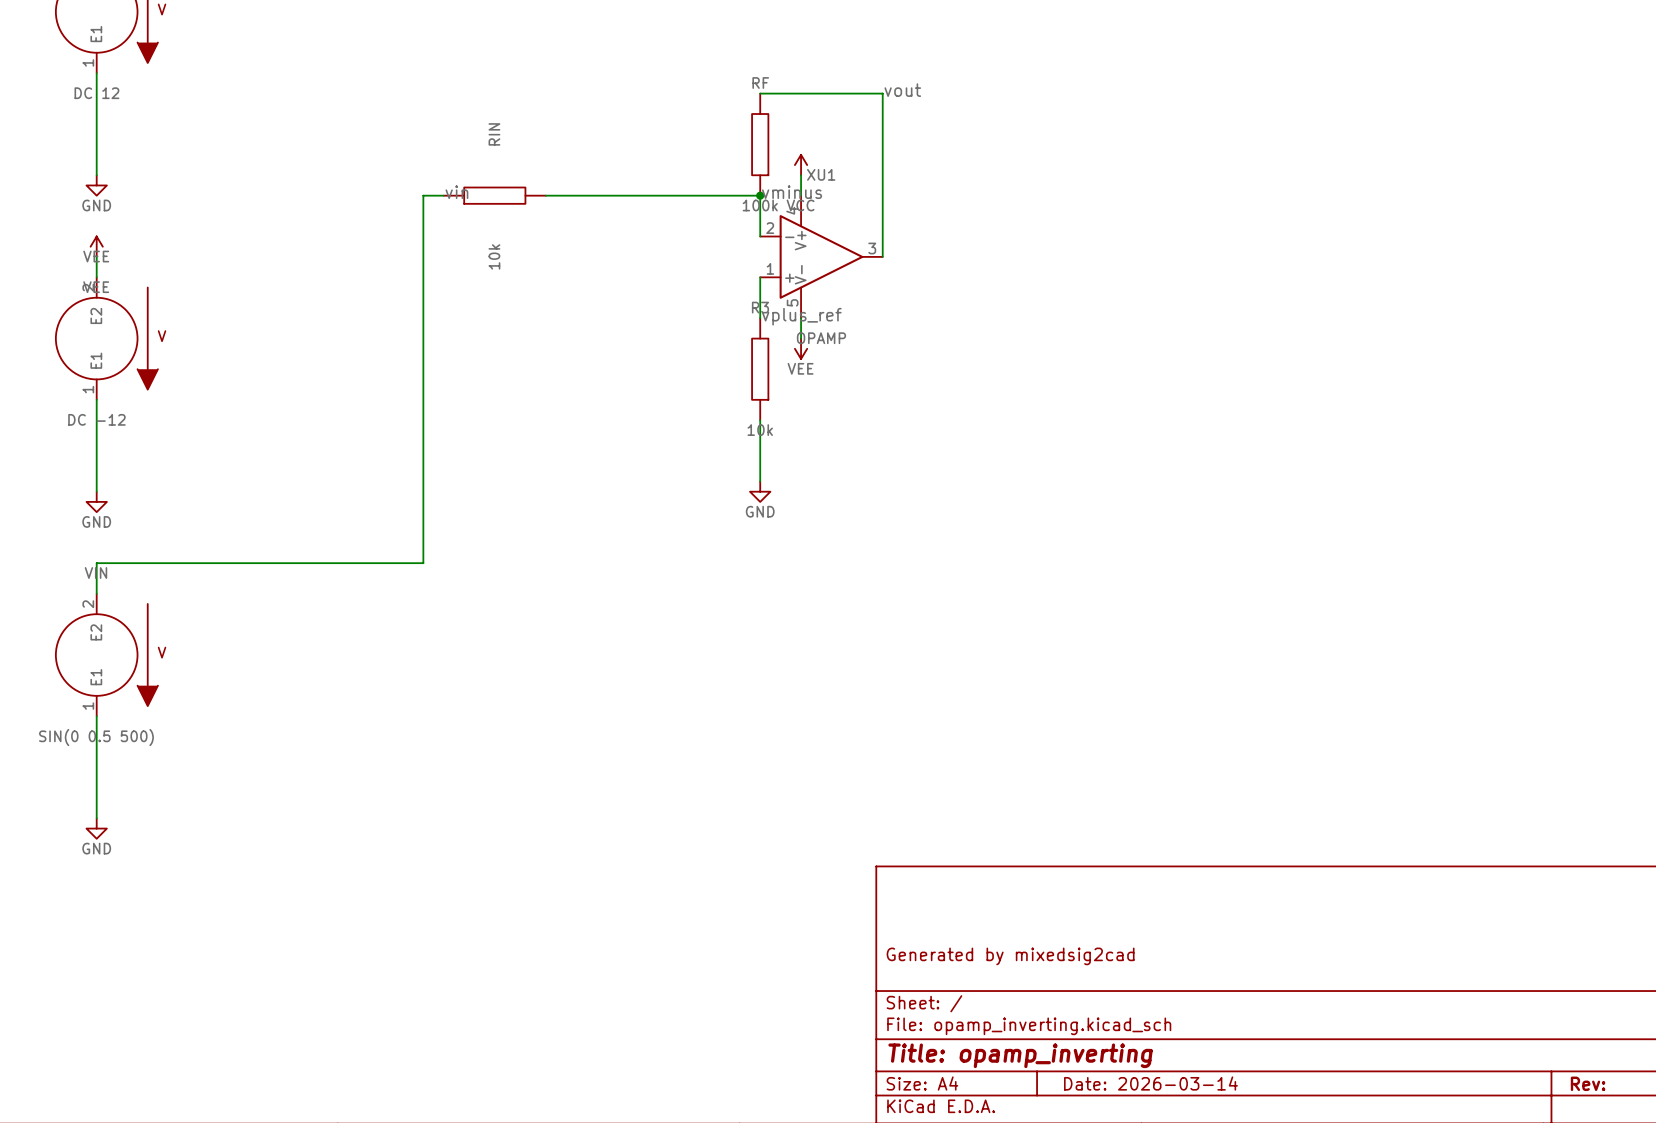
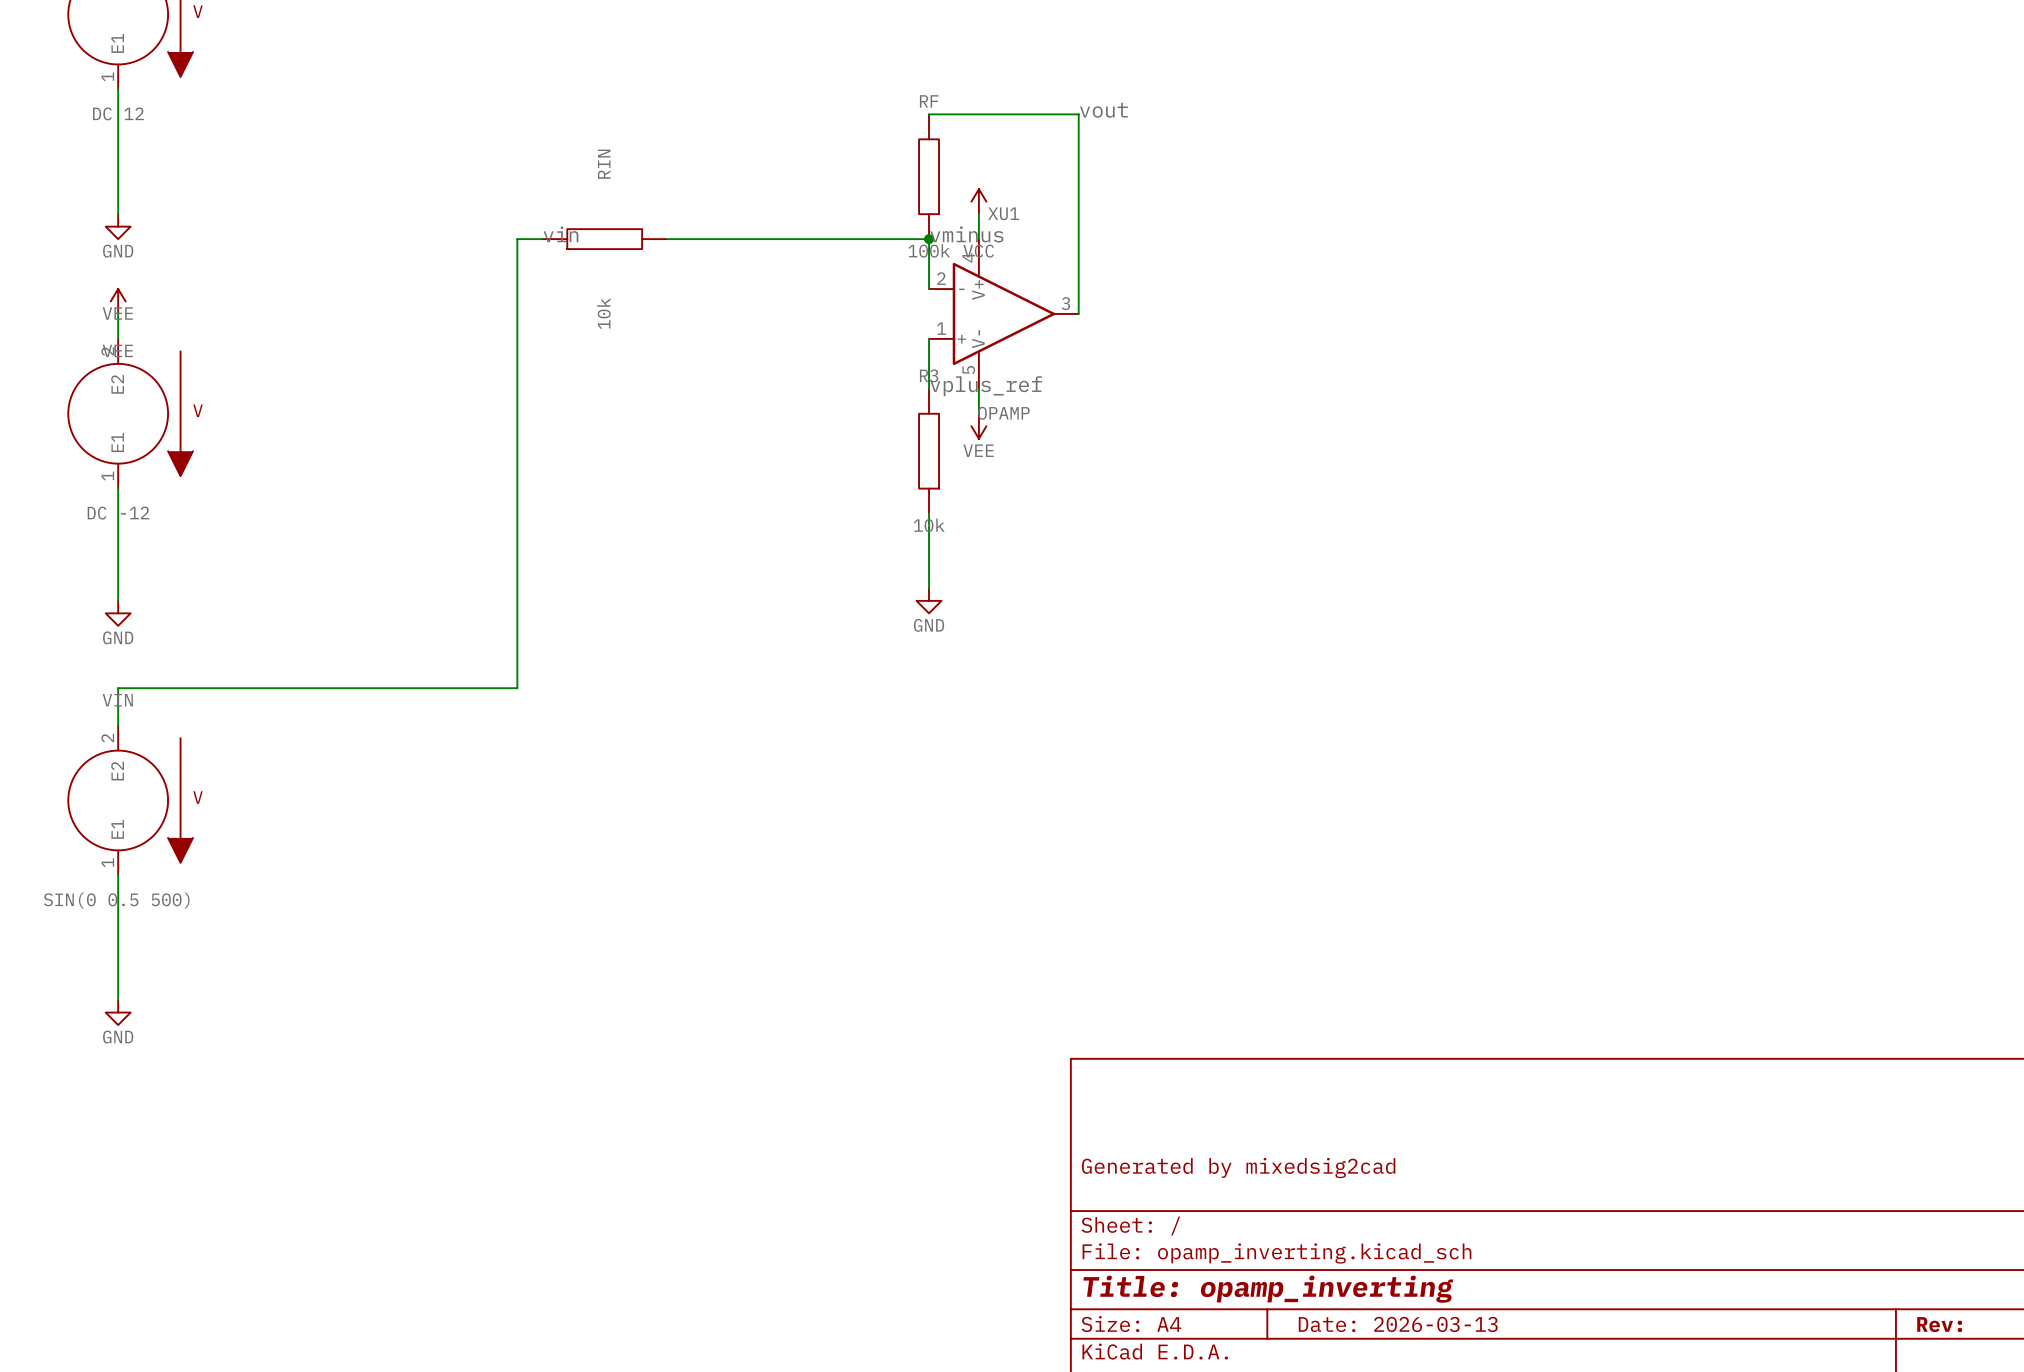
title block: Date: 2026-03-14 (1150, 1083) -> Date: 2026-03-13 (1398, 1324)

